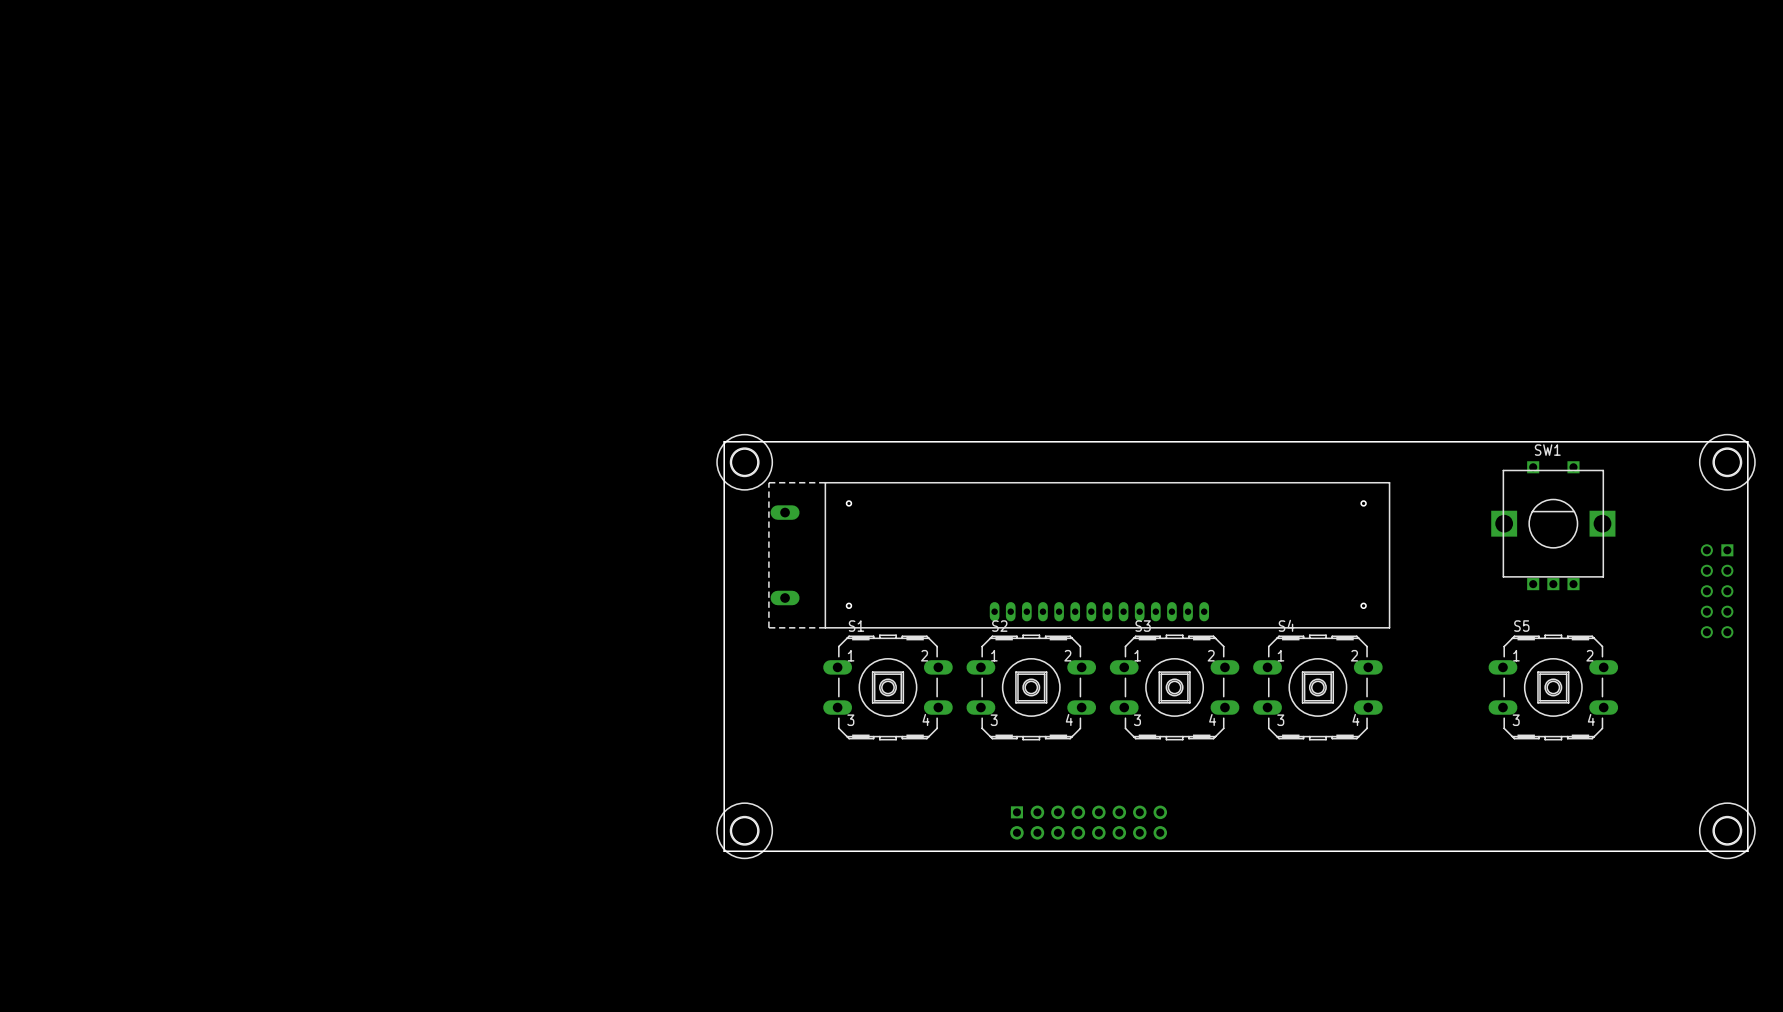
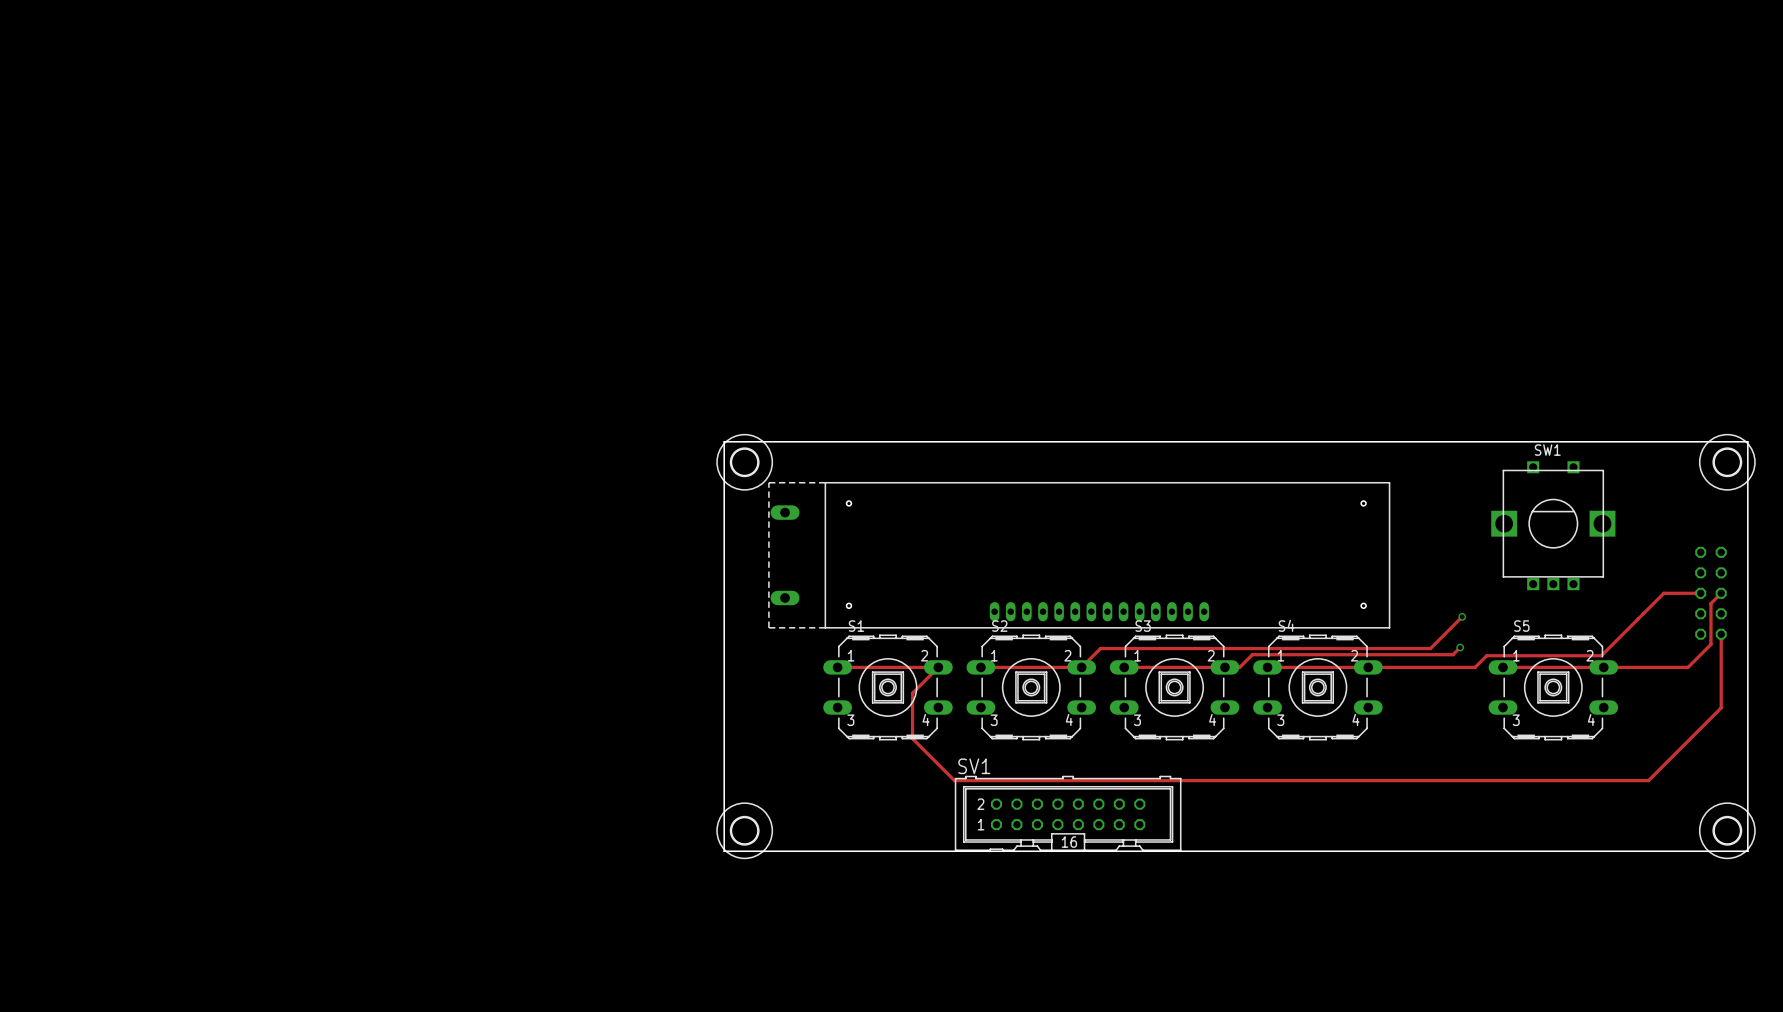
part footprint: [1700, 544, 1734, 639] -> [1695, 546, 1727, 640]
track: none -> (1700, 593) (1663, 593) (1601, 655) (1486, 655) (1475, 667) (1267, 667)
track: none -> (1721, 593) (1710, 603) (1710, 644) (1688, 667) (1502, 667)
track: none -> (1462, 616) (1430, 648) (1100, 648) (1081, 667) (980, 667)
via: none -> (1462, 616)
track: none -> (1721, 634) (1721, 707) (1648, 780) (954, 780) (912, 738) (912, 693) (938, 667) (837, 667)
track: none -> (1460, 647) (1453, 654) (1252, 654) (1239, 667) (1124, 667)
via: none -> (1460, 647)
SV1: none -> (1068, 813)
part: (1088, 822) -> none

